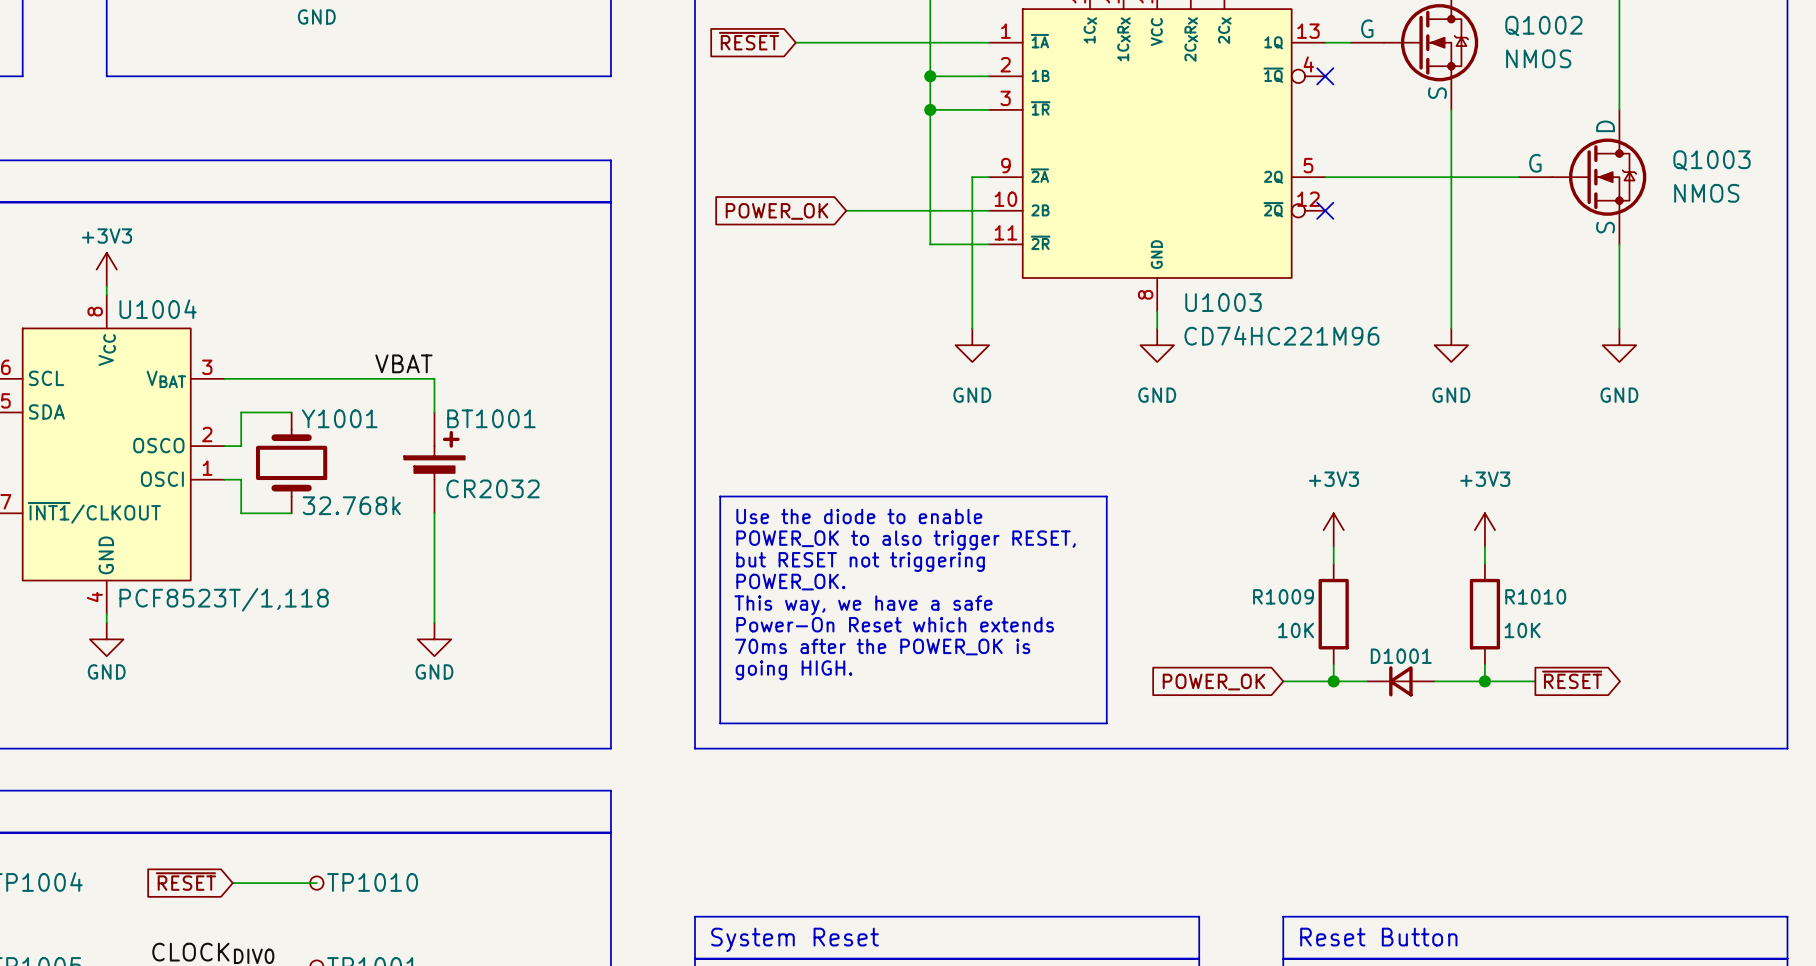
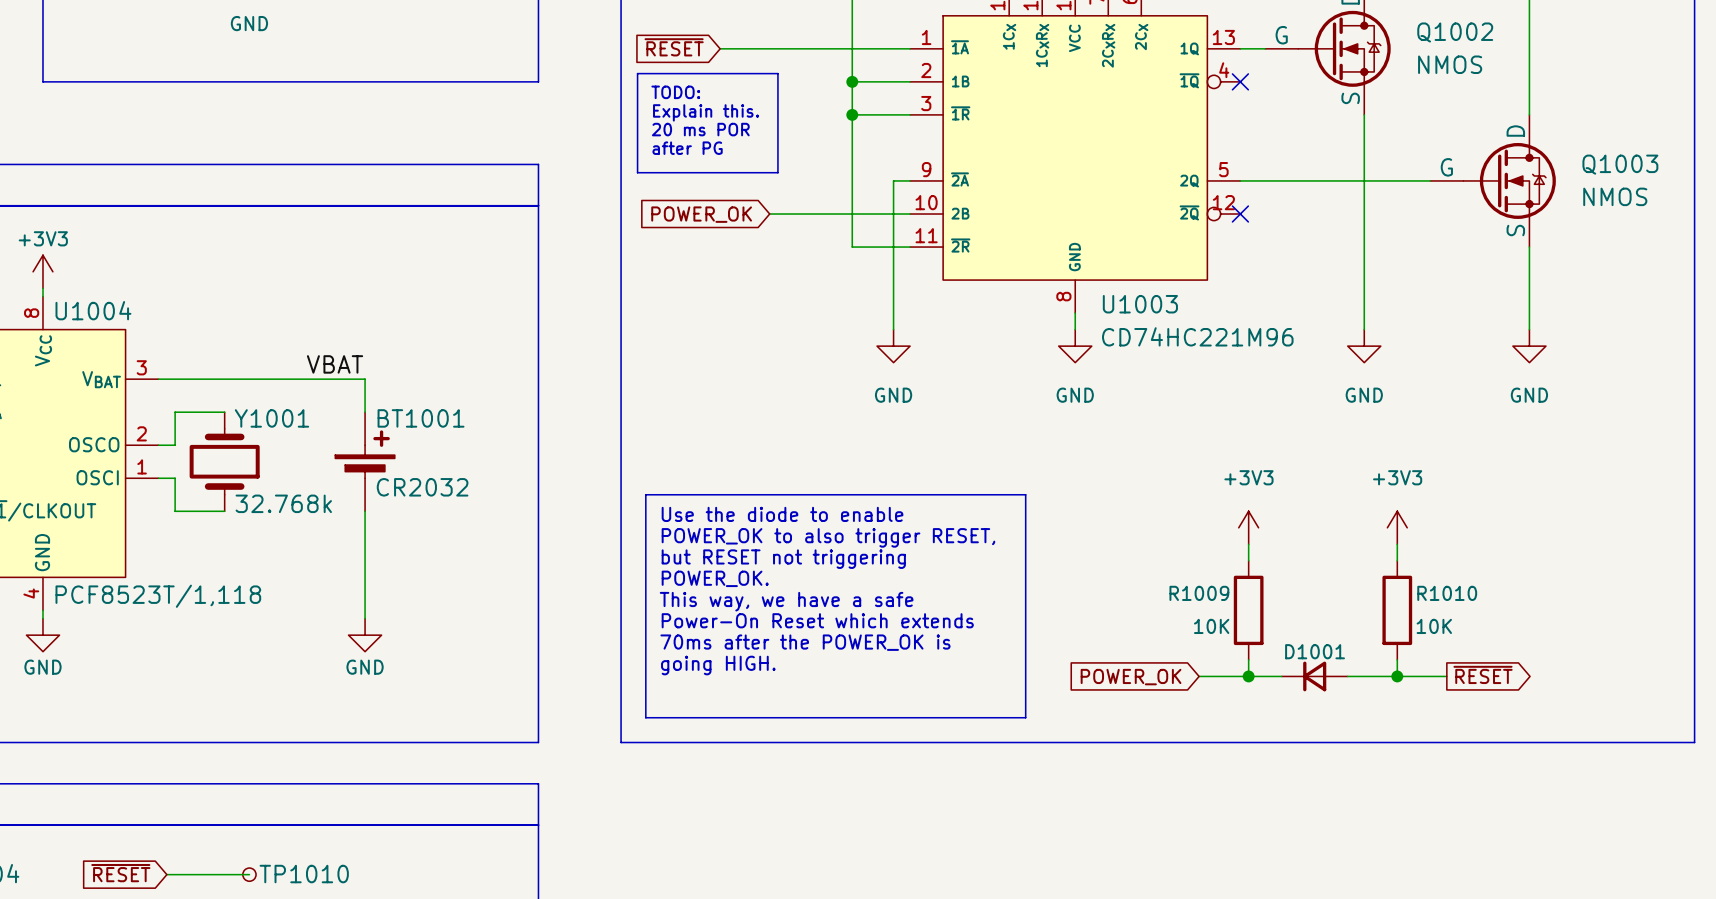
line: none -> (637, 73) (777, 73) (777, 172) (637, 172) (637, 73)
text: none -> TODO: (675, 92)
text: none -> Explain this. (706, 112)
text: none -> 20 ms POR (700, 129)
text: none -> after PG (687, 148)

